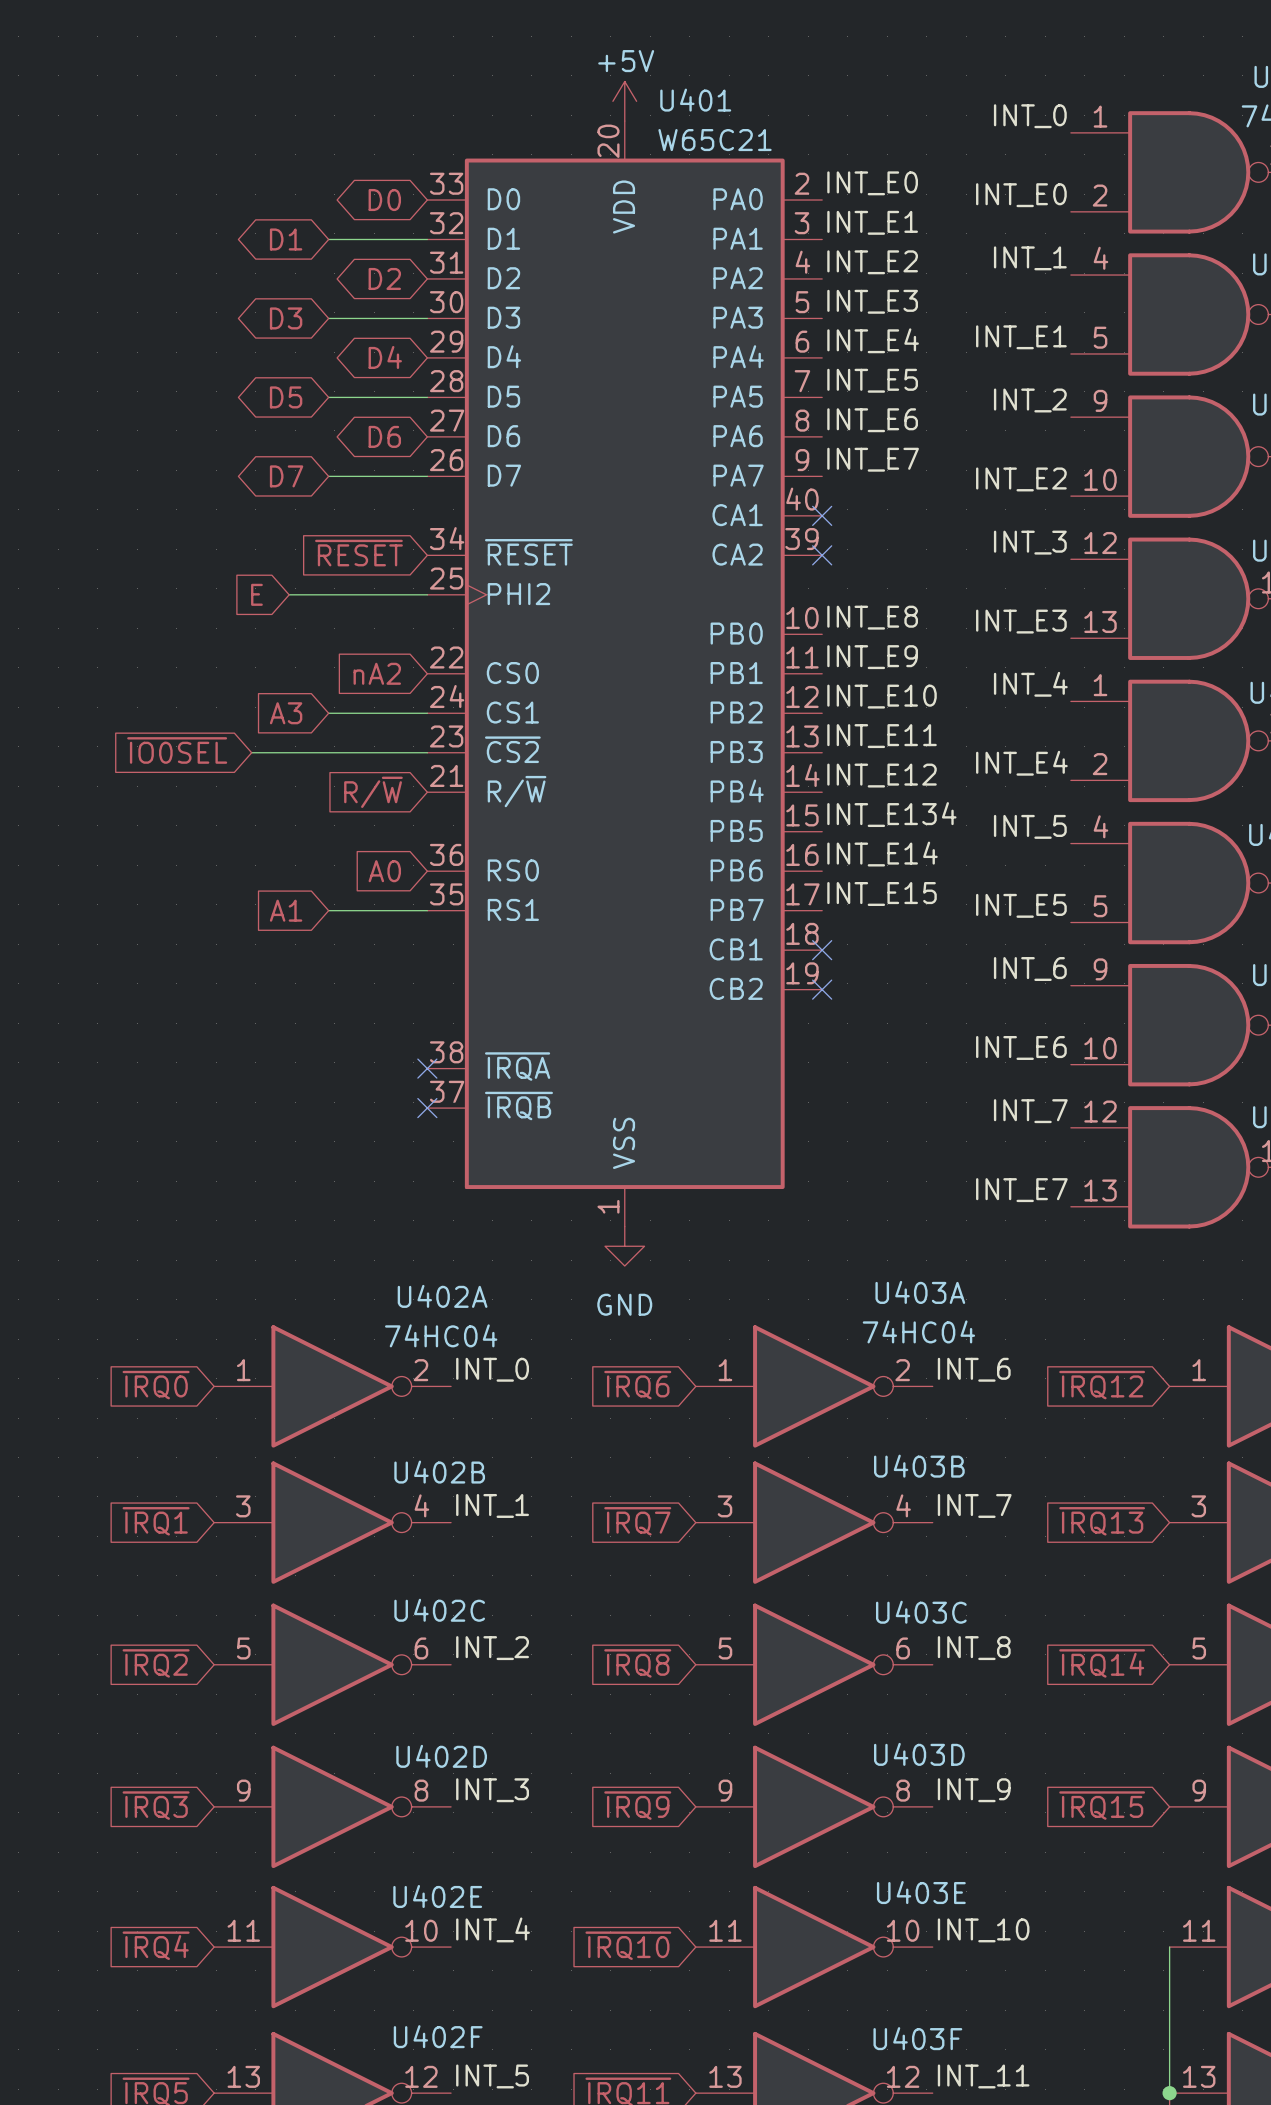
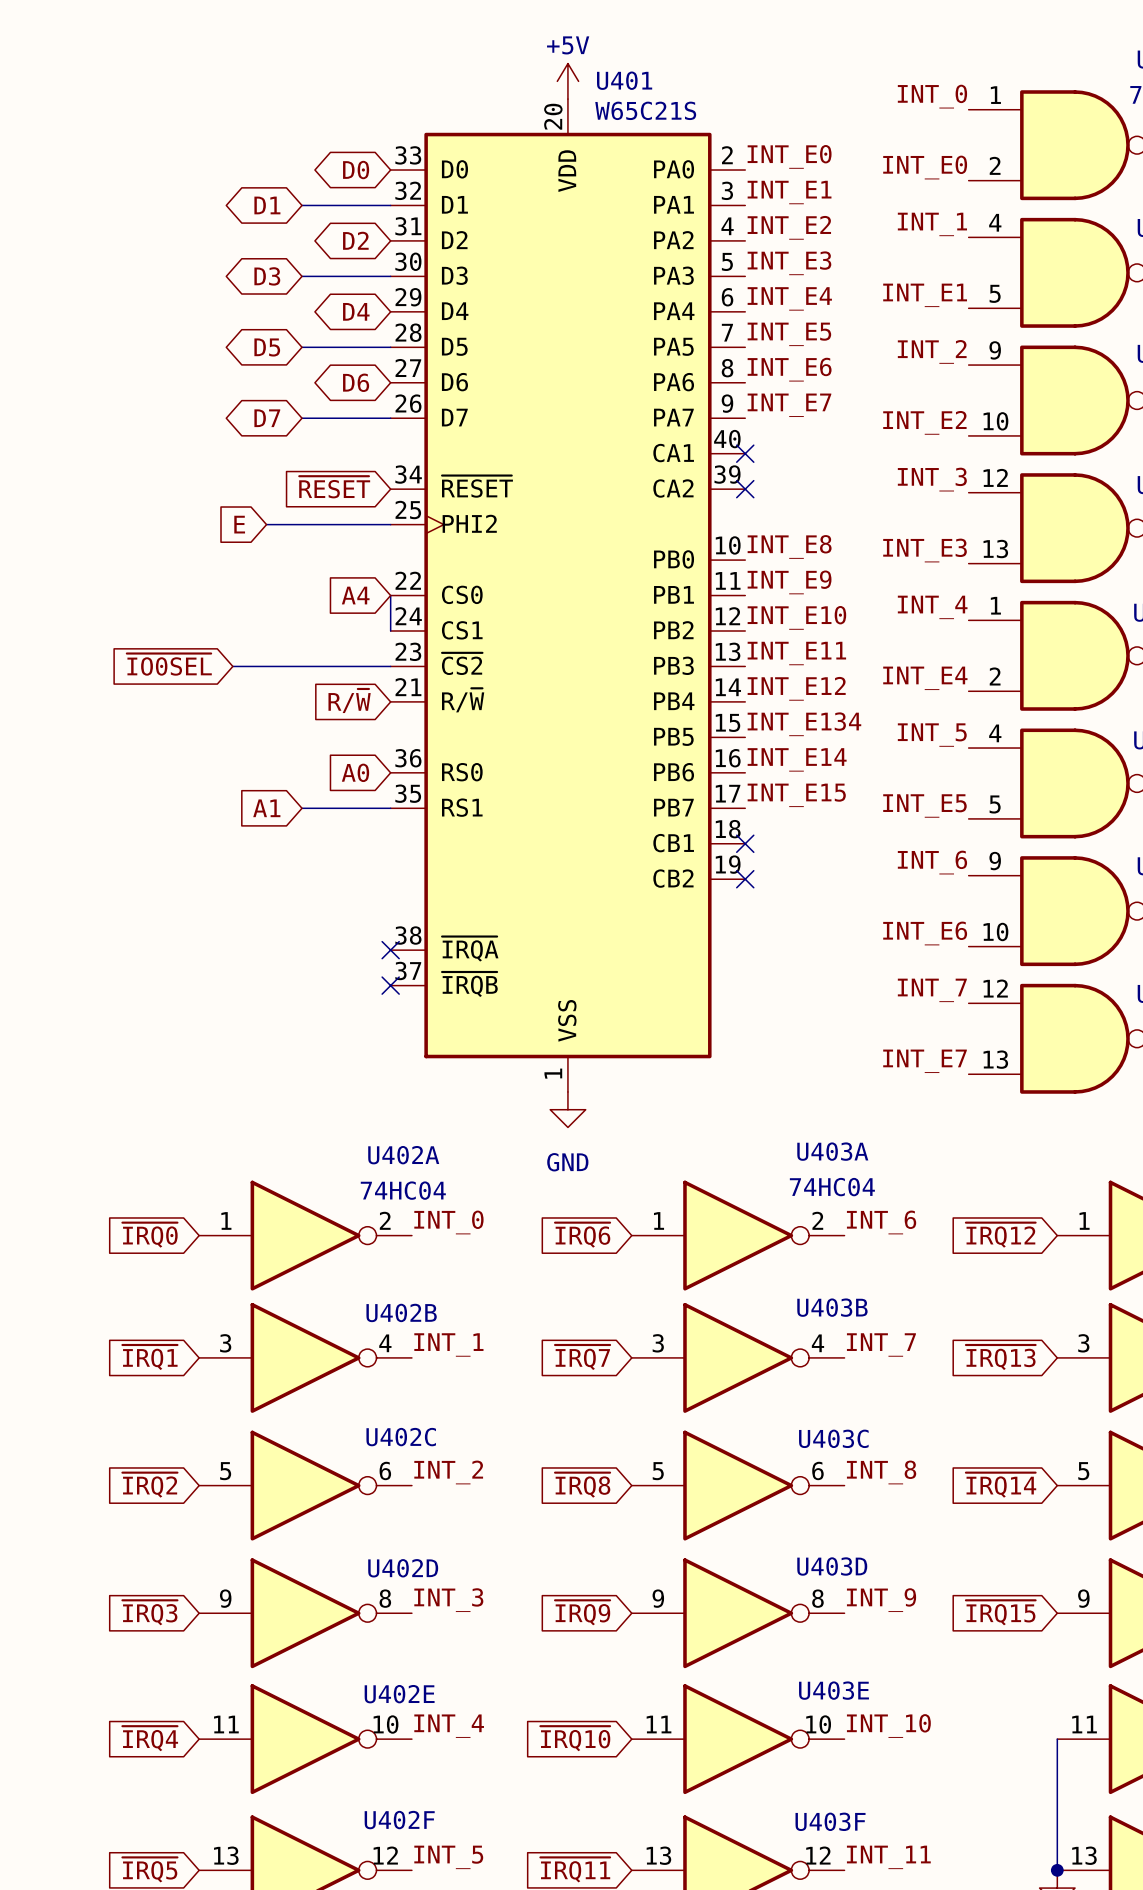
U401 value: W65C21 (715, 140) -> W65C21S (645, 110)
global label: nA2 (377, 673) -> A4 (355, 595)
global label: A3 (286, 713) -> none
wire: (328, 713) (427, 713) -> (390, 595) (390, 630)

